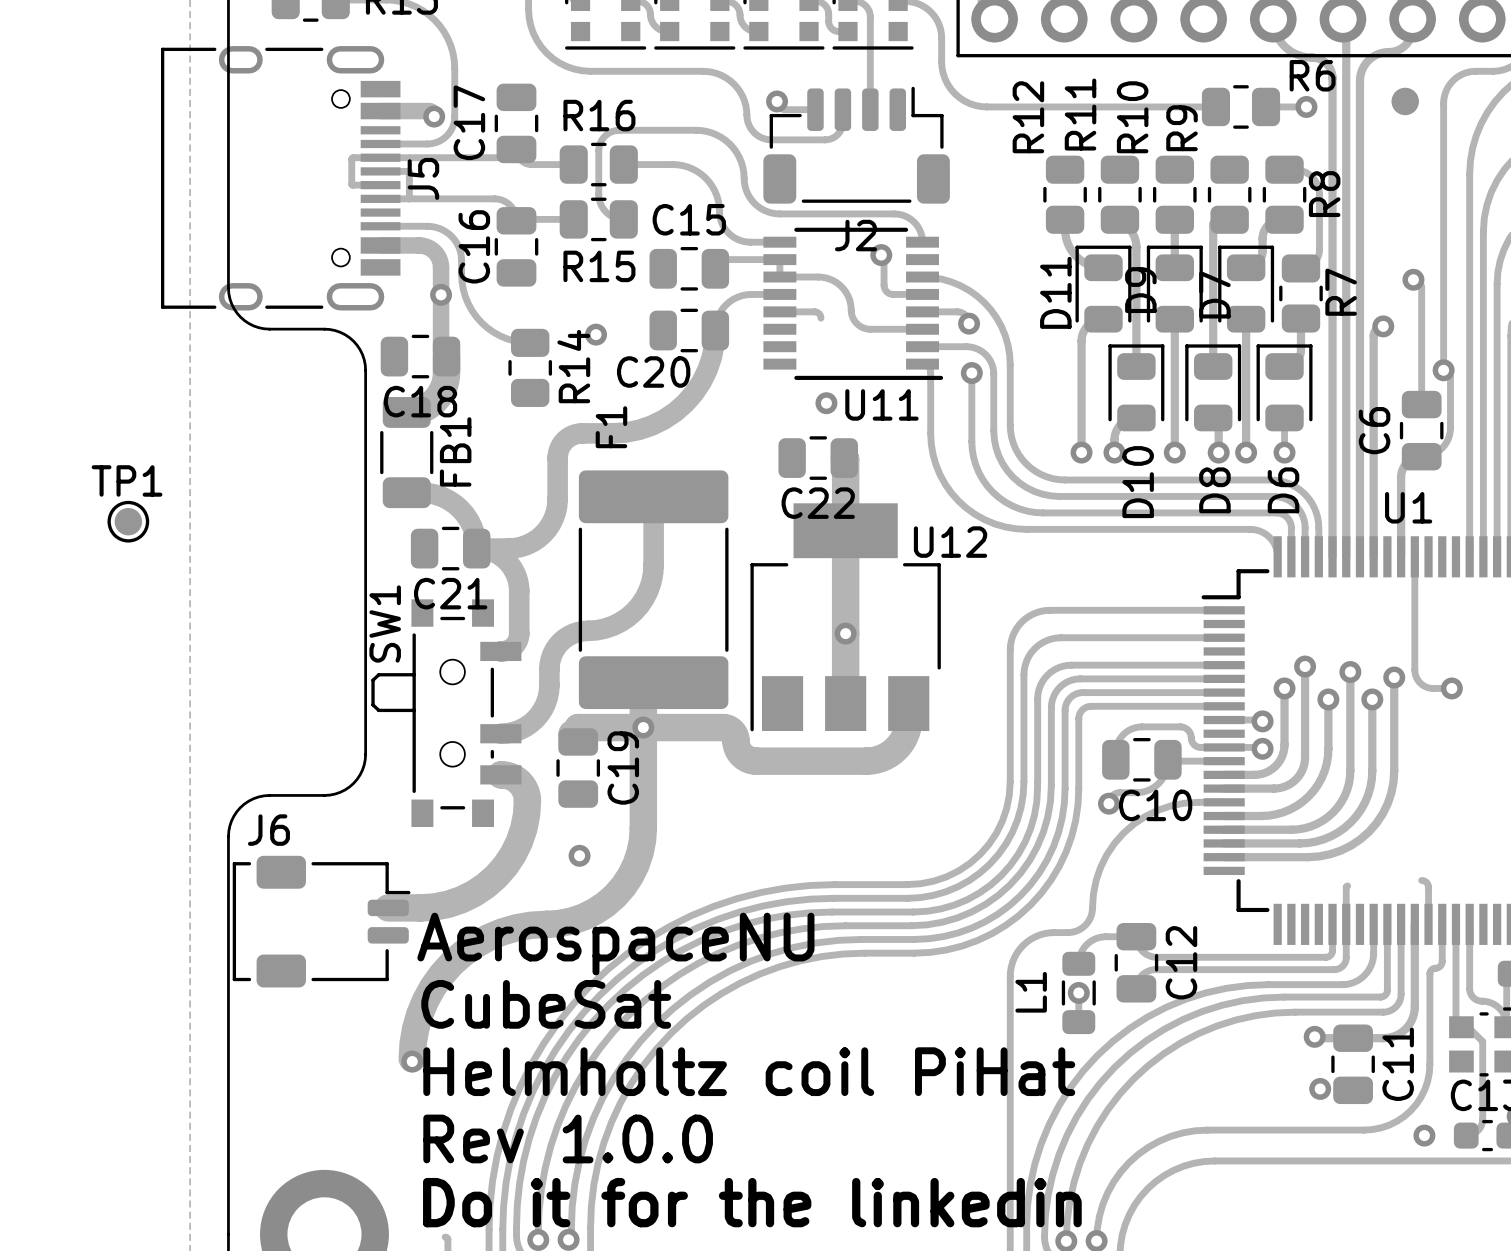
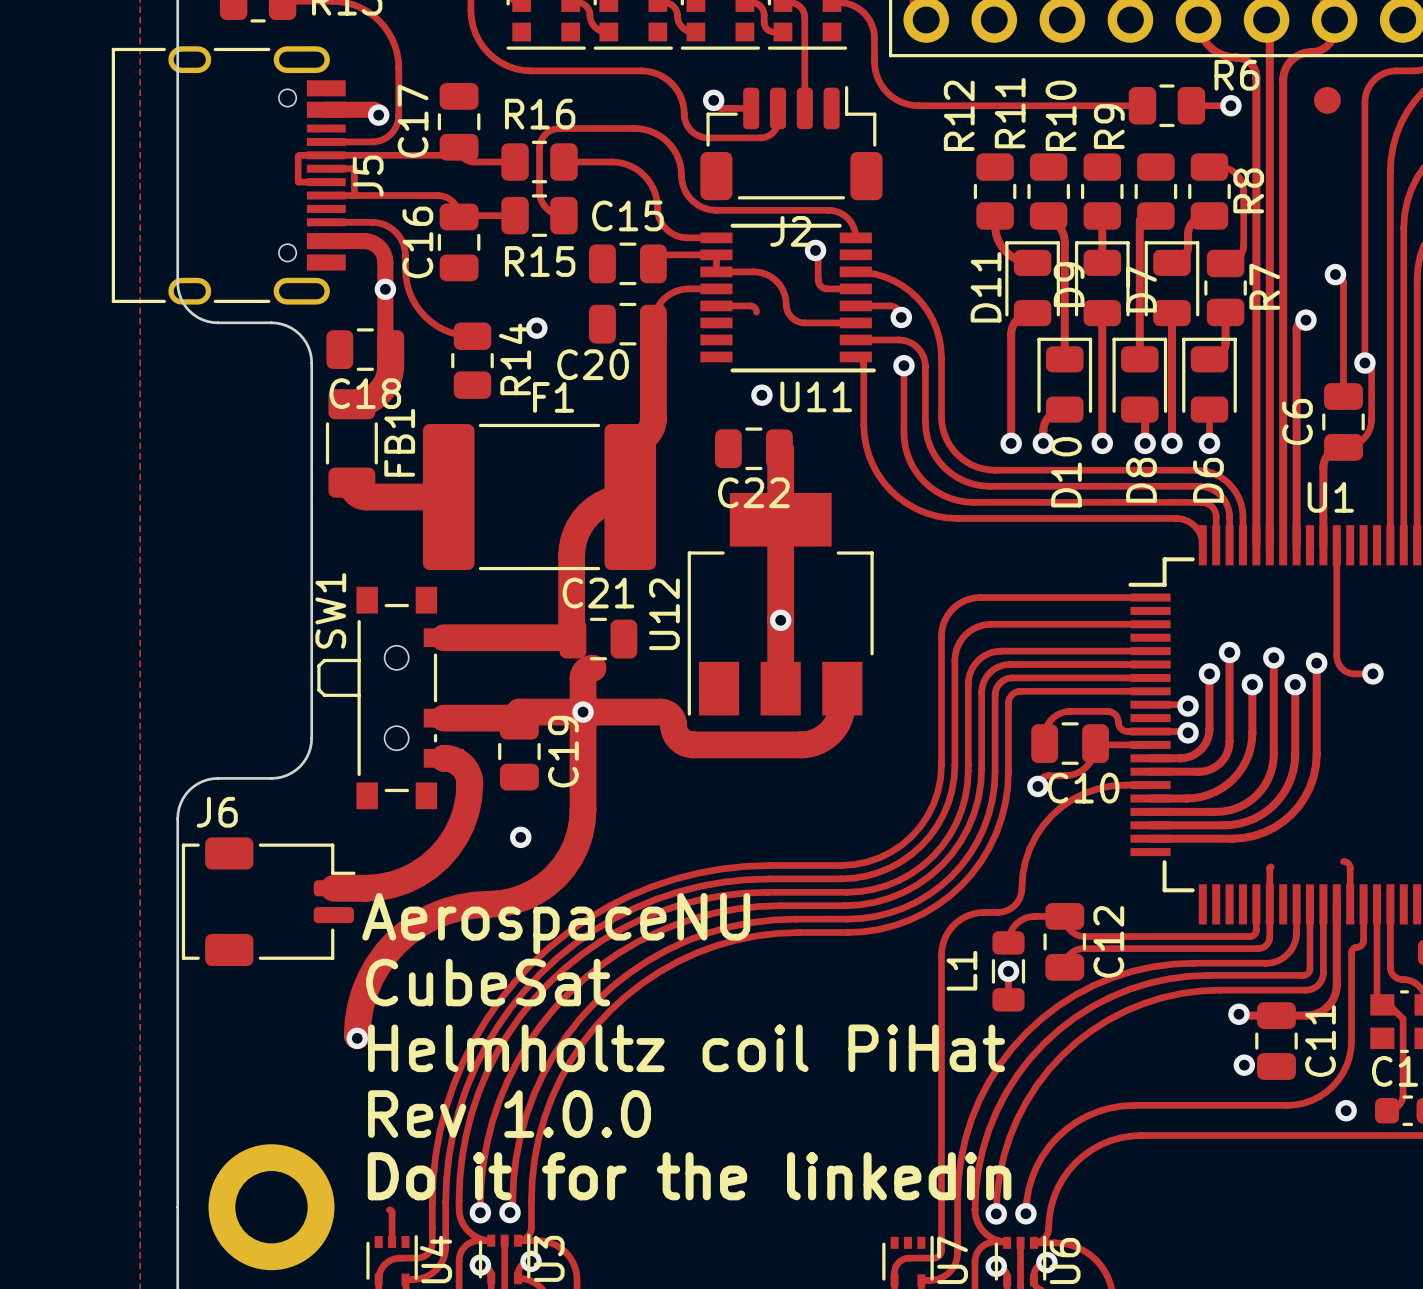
track: (715, 330) (711, 357) (701, 381) (694, 393) (675, 412) (663, 419) (639, 429) (612, 433) (579, 433) (569, 436) (562, 443) (557, 454) (555, 511) (551, 523) (543, 534) (532, 541) (521, 546) (476, 548) -> (653, 324) (652, 423) (644, 436) (630, 441) (630, 497) (615, 499) (600, 504) (588, 514) (576, 533) (571, 555) (571, 644) (569, 639) (564, 637) (443, 637)
F1 name position: F1 (611, 427) -> F1 (553, 397)
track: (406, 492) (435, 494) (454, 504) (465, 514) (472, 527) (476, 548) -> (351, 482) (355, 491) (364, 496) (448, 497)
track: (653, 496) (653, 573) (644, 597) (634, 611) (620, 622) (604, 628) (577, 632) (560, 642) (550, 659) (548, 691) (542, 709) (535, 719) (525, 727) (513, 732) (500, 733) -> (513, 718) (443, 718)
TP1: (128, 521) -> none
U12 name rotation: 0° (950, 542) -> 90° counterclockwise (664, 614)
U12 name position: U12 (950, 542) -> U12 (664, 614)
C21 position: (450, 548) -> (598, 639)
track: (476, 548) (490, 550) (503, 557) (512, 568) (518, 581) (518, 638) (512, 647) (501, 651) -> none
F1 rotation: 0° (653, 589) -> 90° clockwise (539, 497)
C21 name position: C21 (450, 593) -> C21 (598, 593)

